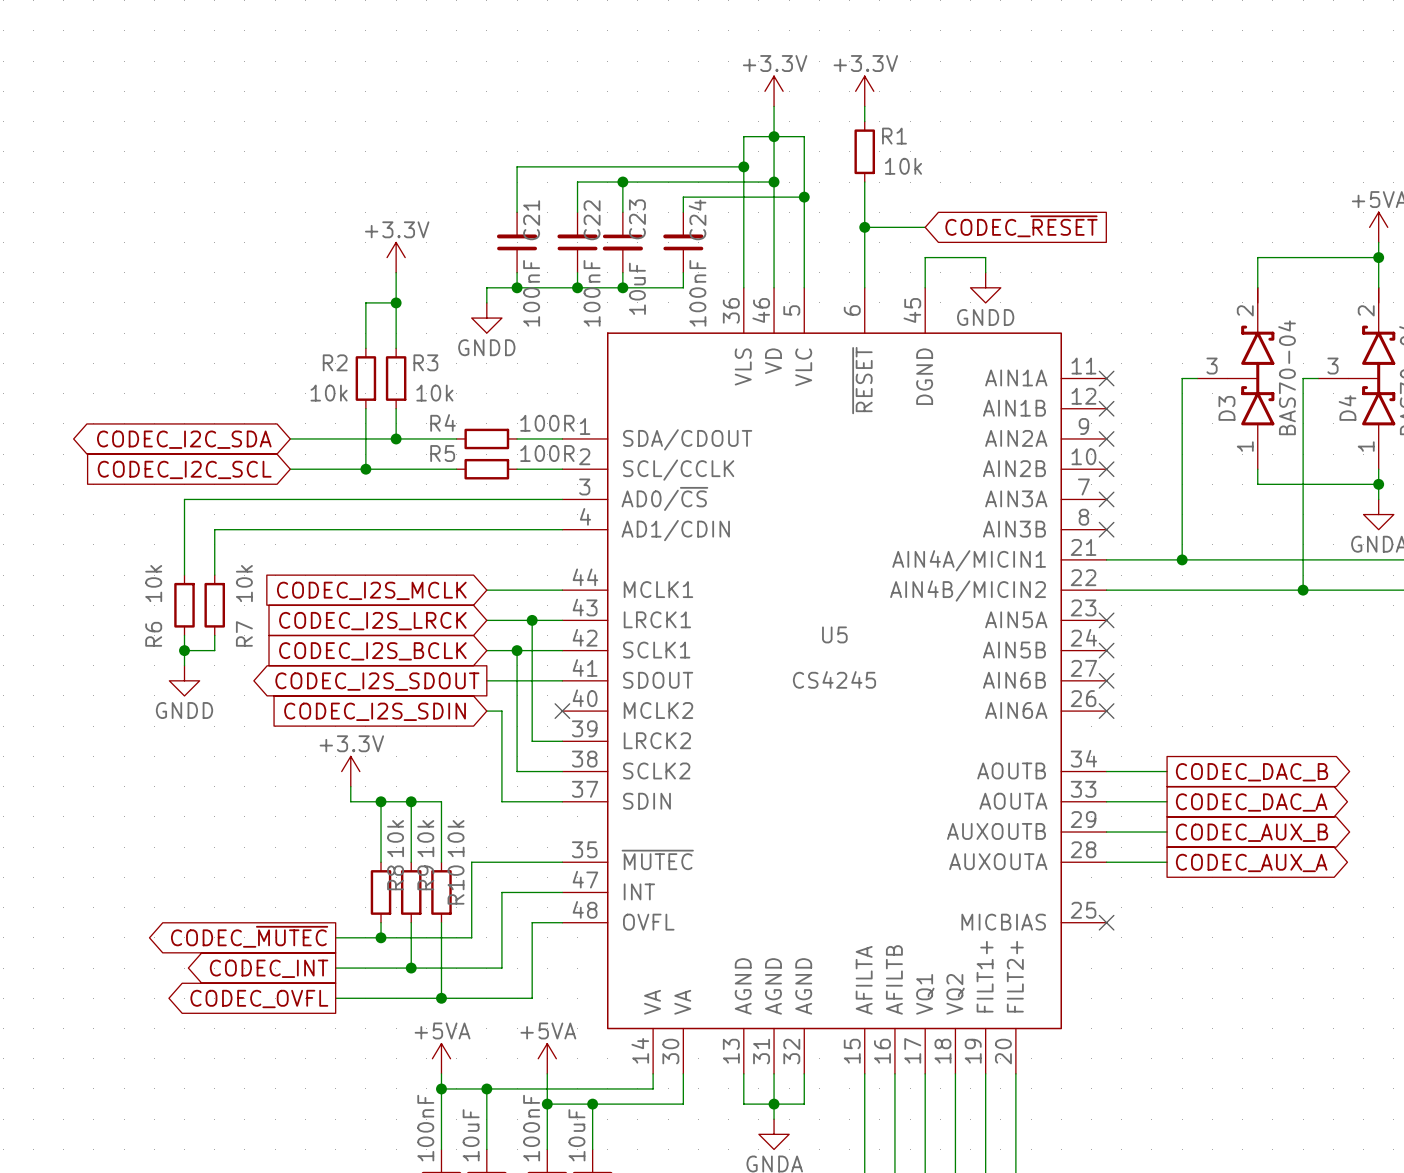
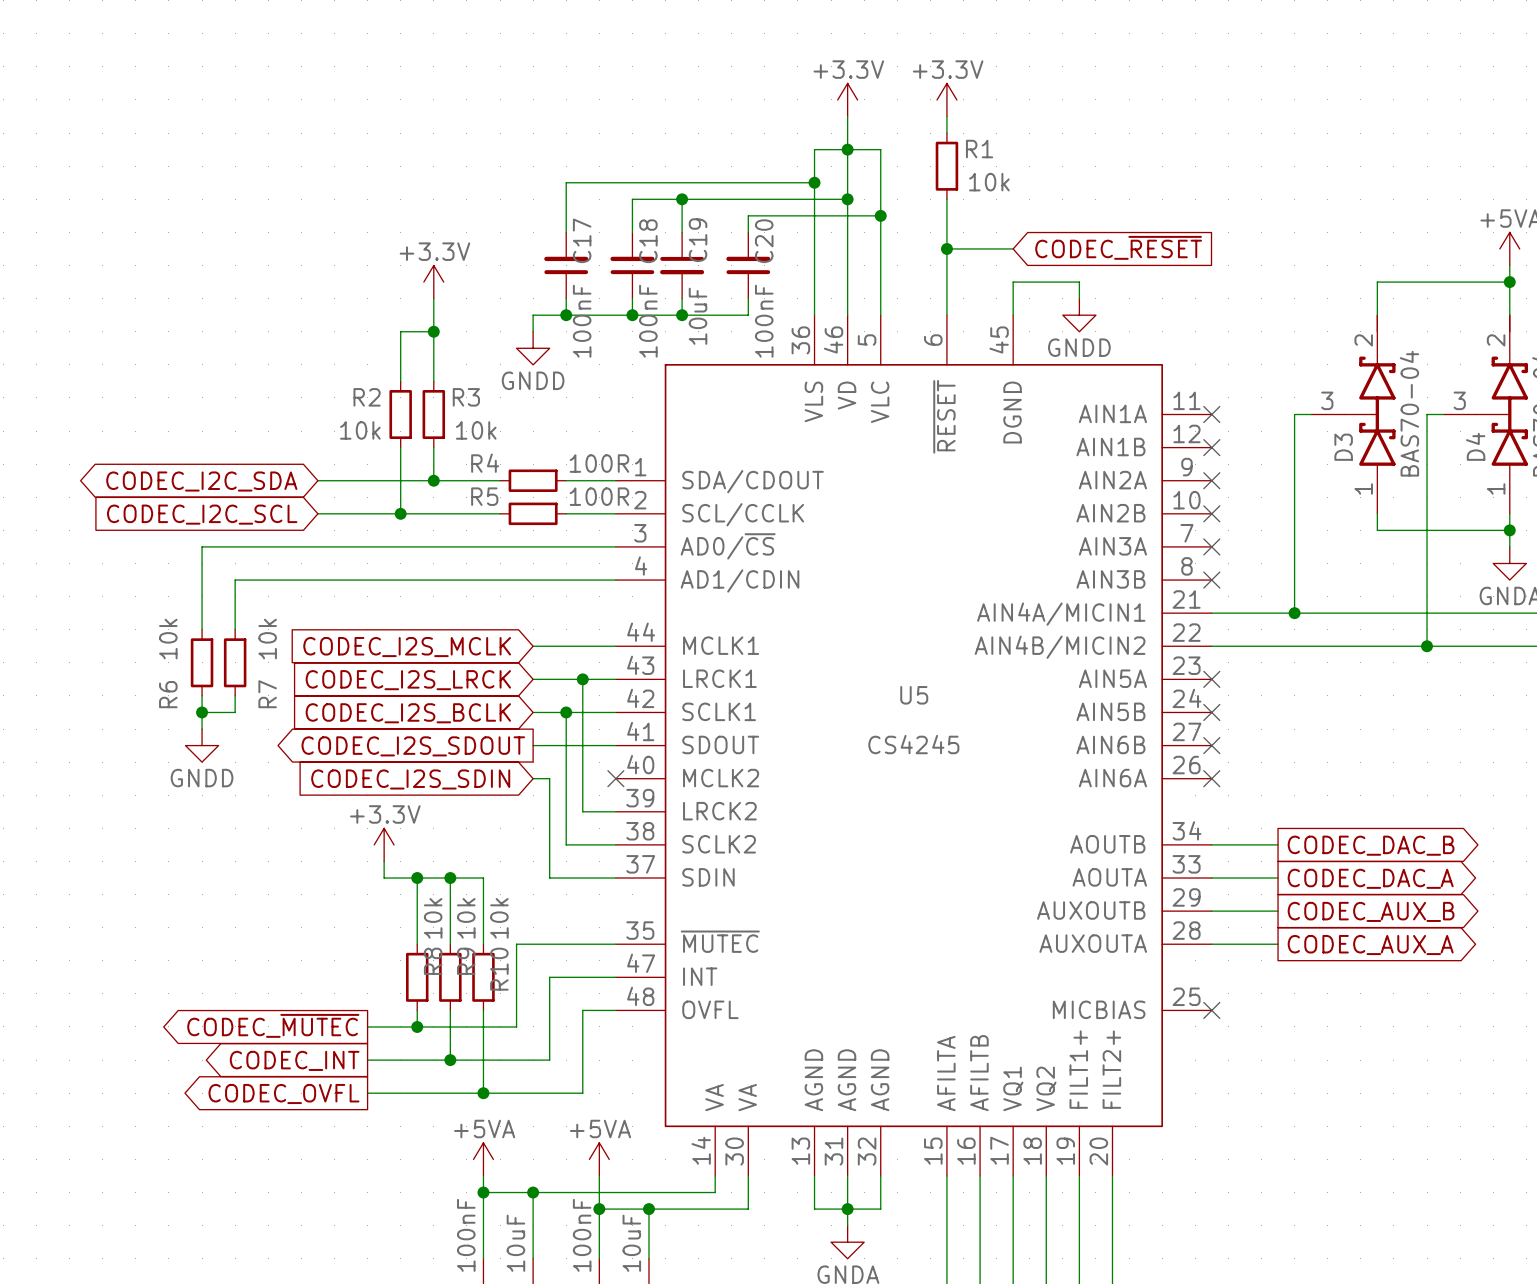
C23 name: C23 (637, 219) -> C19 (698, 240)
C24 name: C24 (697, 219) -> C20 (764, 241)
C21 name: C21 (531, 220) -> C17 (582, 240)
C22 name: C22 (592, 220) -> C18 (648, 241)

